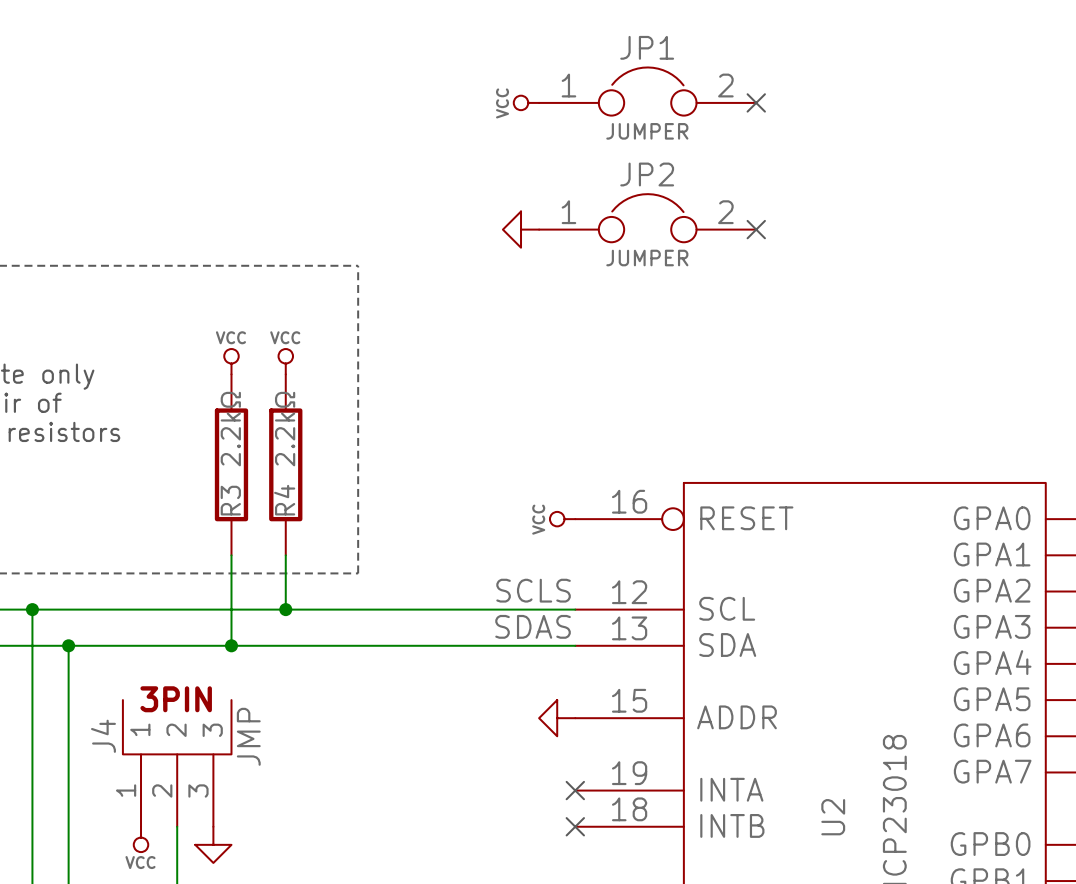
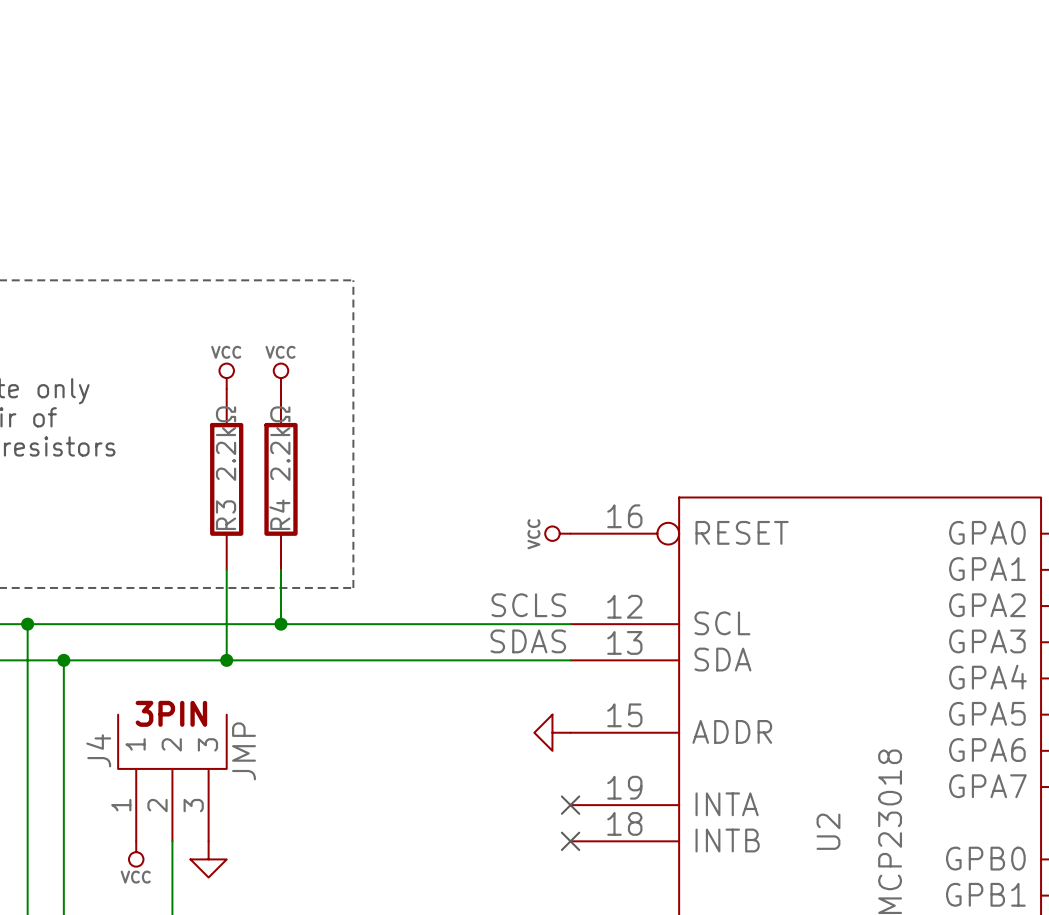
JP1: JUMPER (647, 91) -> none
power symbol: VCC (526, 102) -> none
no-connect mark: (756, 102) -> none
JP2: JUMPER (647, 218) -> none
power symbol: (521, 229) -> none
no-connect mark: (756, 229) -> none

